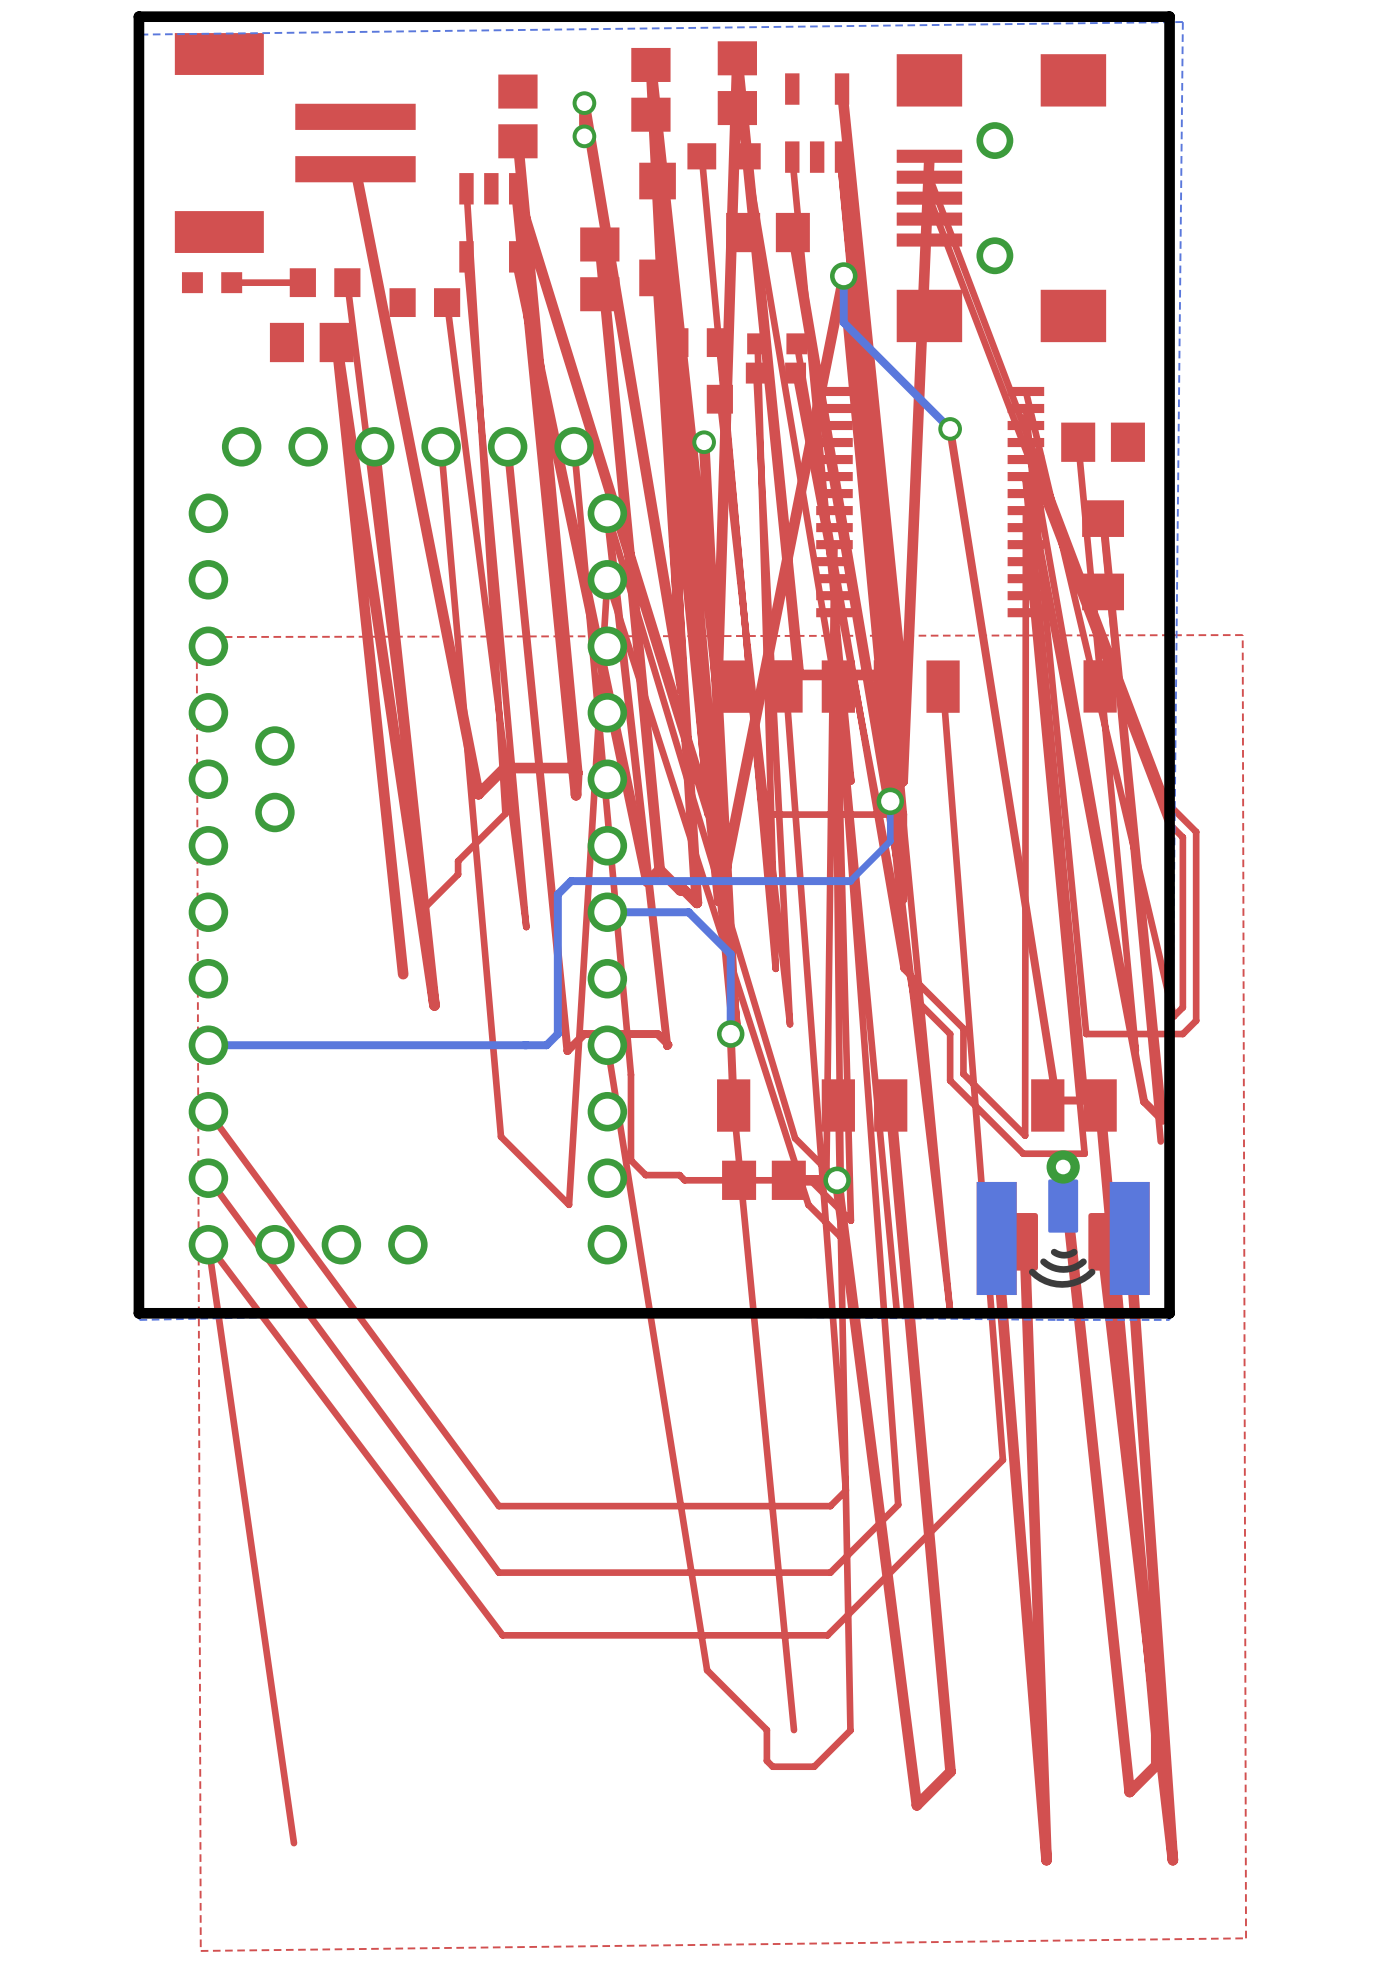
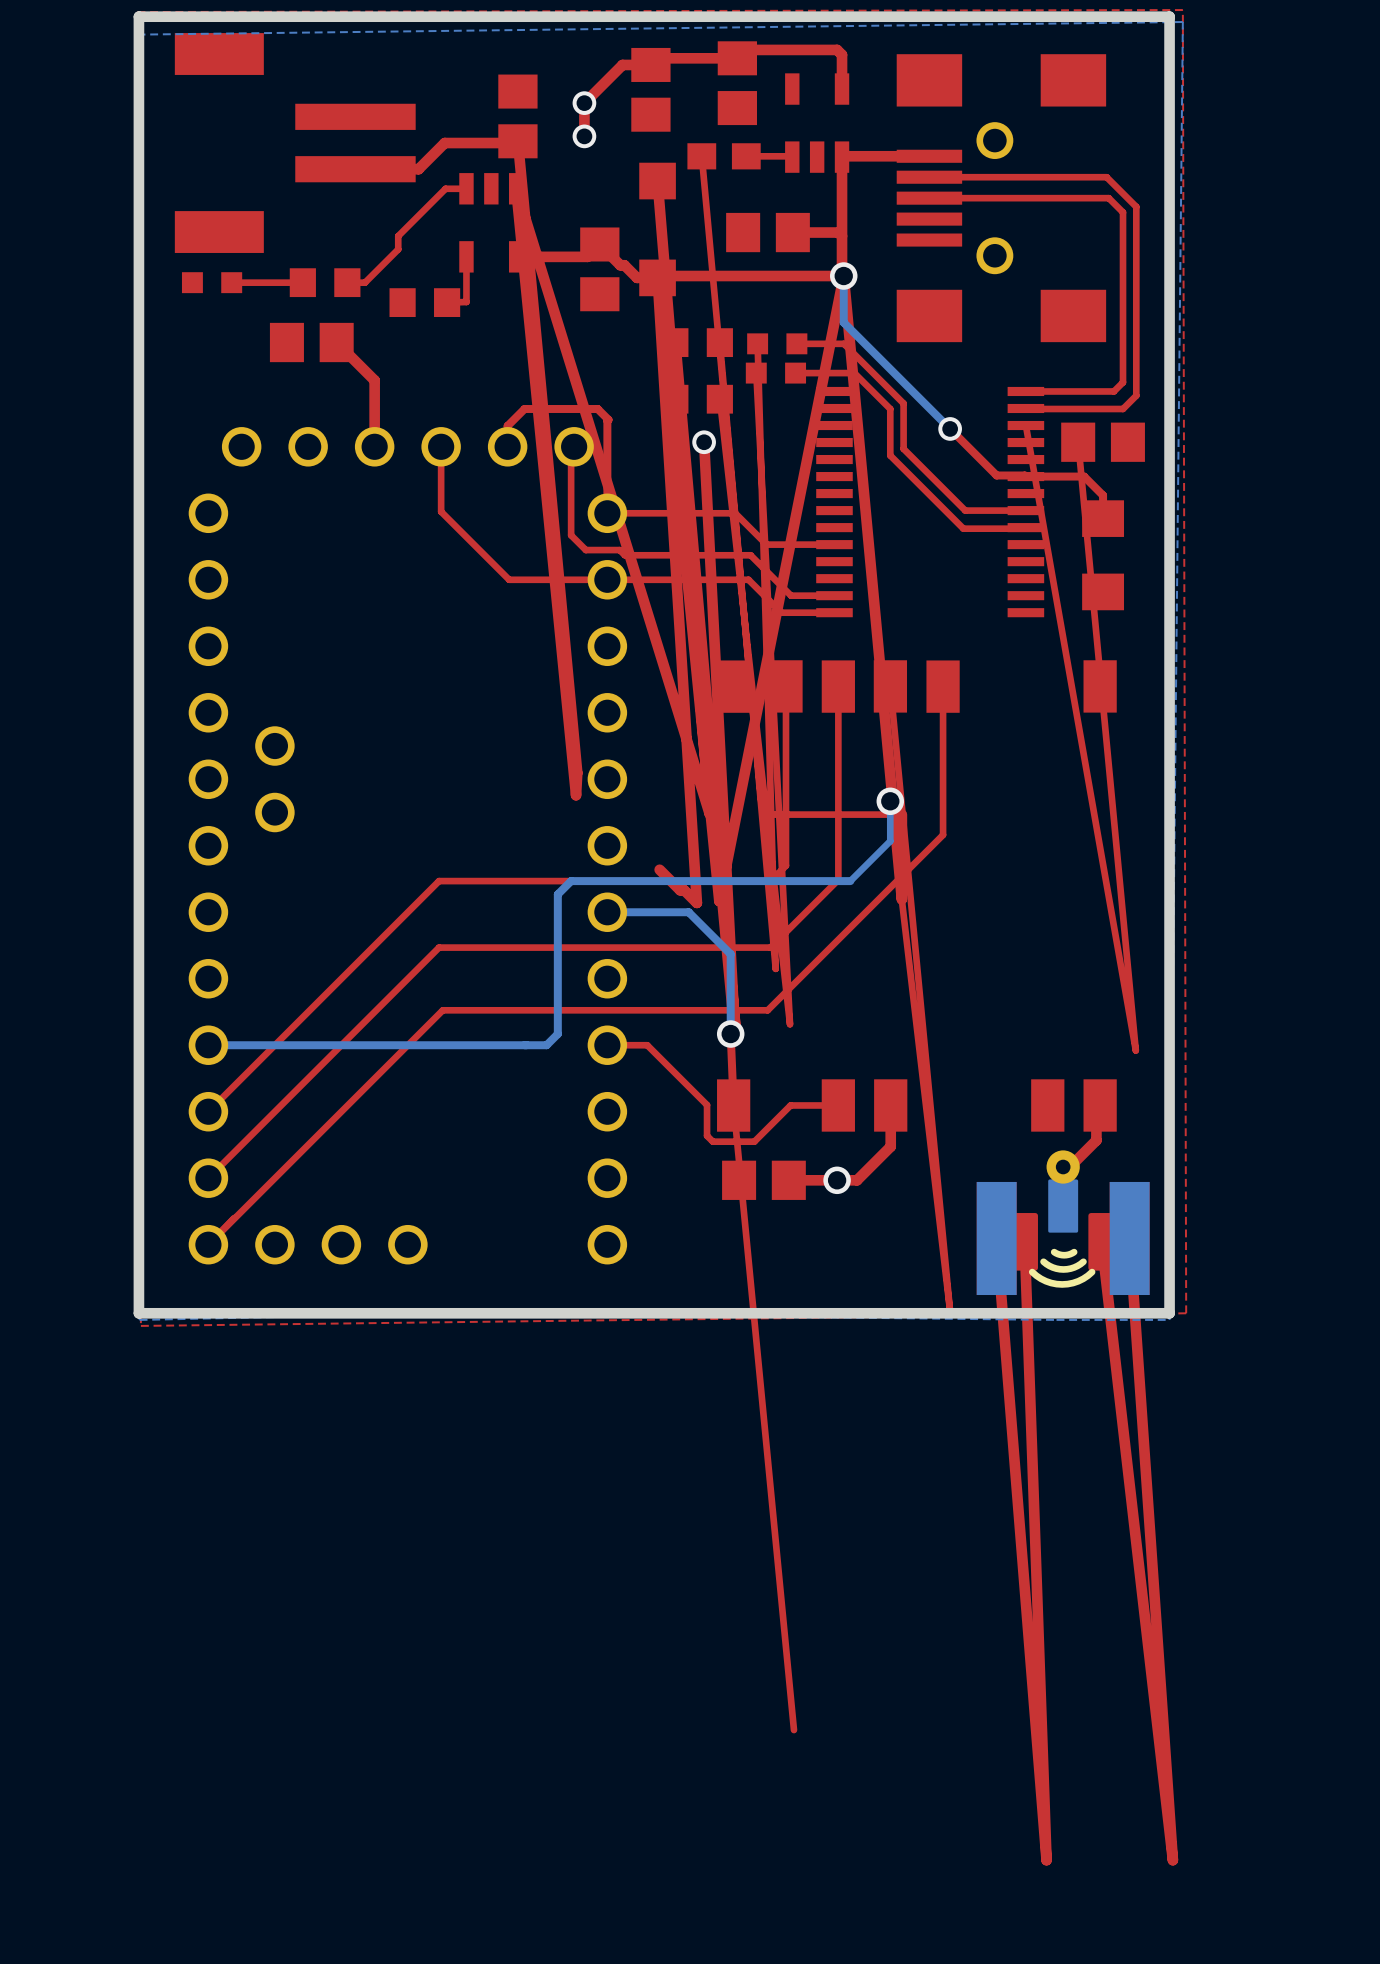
top track: (842, 89) (901, 679) (896, 674) (798, 674) (737, 58) (717, 683) (650, 64) (682, 689) (584, 103) -> (842, 89) (842, 54) (837, 49) (739, 49) (737, 58) (657, 58) (650, 64) (622, 64) (584, 103)
top track: (746, 156) (851, 781) (792, 157) -> (746, 156) (792, 157)
top track: (929, 156) (902, 781) (842, 157) (901, 814) -> none
top track: (355, 169) (478, 794) (504, 768) (572, 768) (577, 772) -> (355, 169) (418, 169) (444, 143) (512, 143) (517, 147)
top track: (929, 177) (1166, 802) (1196, 831) (1196, 1020) (1182, 1034) (1086, 1034) (1025, 408) -> (929, 177) (1106, 177) (1136, 206) (1136, 395) (1123, 408) (1025, 408)
top track: (466, 188) (505, 813) (458, 861) (458, 874) (424, 907) (347, 282) -> (466, 188) (445, 188) (398, 236) (398, 249) (365, 282) (347, 282)
top track: (929, 198) (1168, 823) (1182, 837) (1182, 1007) (1173, 1016) (1025, 391) -> (929, 198) (1108, 198) (1123, 212) (1123, 382) (1113, 391) (1025, 391)
top track: (792, 232) (898, 857) (901, 861) -> (792, 232) (838, 232) (842, 236)
top track: (599, 244) (659, 869) (647, 881) (516, 256) -> (929, 156) (842, 157) (842, 274) (843, 276) (659, 276) (657, 277) (637, 277) (624, 265) (620, 265) (599, 244) (587, 256) (516, 256)
top track: (466, 256) (526, 927) (447, 302) -> (466, 256) (466, 302) (447, 302)
top track: (796, 343) (903, 968) (963, 1028) (963, 1073) (1025, 1135) (1025, 510) -> (796, 343) (843, 343) (903, 403) (903, 448) (965, 510) (1025, 510)
top track: (795, 373) (914, 998) (950, 1034) (950, 1080) (1023, 1153) (1084, 1153) (1025, 527) -> (795, 373) (854, 373) (890, 408) (890, 455) (963, 528) (1025, 527)
top track: (950, 428) (1056, 1100) (1084, 1100) (1025, 476) (1144, 1101) (1162, 1120) (1103, 518) (1160, 1141) -> (950, 428) (996, 475) (1084, 476) (1103, 495) (1103, 518) (1100, 516)
top track: (374, 446) (434, 1005) (336, 342) (403, 974) -> (374, 446) (374, 380) (336, 342)
top track: (441, 446) (500, 1136) (569, 1204) (607, 579) (808, 1204) (841, 1237) (834, 612) -> (441, 446) (441, 511) (509, 579) (748, 579) (781, 612) (834, 612)
top track: (507, 446) (567, 1050) (584, 1034) (657, 1034) (668, 1044) (667, 1046) (607, 513) (795, 1138) (826, 1169) (834, 544) -> (507, 446) (507, 425) (524, 408) (597, 408) (608, 419) (607, 513) (735, 513) (766, 544) (834, 544)
top track: (574, 446) (630, 1074) (630, 1160) (645, 1175) (679, 1175) (684, 1180) (810, 1180) (850, 1220) (834, 595) -> (574, 446) (571, 449) (571, 535) (585, 550) (619, 550) (624, 555) (750, 555) (791, 595) (834, 595)
top zone outline: (1242, 635) (196, 637) (200, 1950) (1246, 1938) (1242, 635) -> (1182, 10) (136, 12) (140, 1325) (1186, 1313) (1182, 10)
top track: (786, 686) (845, 1490) (830, 1506) (498, 1506) (208, 1111) -> (786, 686) (786, 865) (770, 881) (439, 881) (208, 1111)
top track: (943, 686) (1002, 1459) (827, 1635) (502, 1635) (208, 1244) (293, 1843) -> (943, 686) (943, 834) (767, 1010) (442, 1010) (208, 1244) (234, 1218)
top track: (607, 1045) (707, 1670) (766, 1730) (766, 1760) (772, 1766) (814, 1766) (850, 1730) (838, 1105) -> (607, 1045) (647, 1045) (707, 1105) (707, 1135) (712, 1141) (754, 1141) (790, 1105) (838, 1105)
top track: (890, 1105) (950, 1771) (916, 1805) (837, 1180) -> (890, 1105) (890, 1146) (857, 1180) (837, 1180)
top track: (1100, 1105) (1156, 1734) (1156, 1765) (1129, 1792) (1063, 1167) -> (1100, 1105) (1096, 1109) (1096, 1140) (1069, 1167) (1063, 1167)
top track: (208, 1178) (498, 1572) (830, 1572) (898, 1504) (838, 686) (896, 1312) -> (208, 1178) (439, 947) (770, 947) (838, 879) (838, 686) (837, 687)

